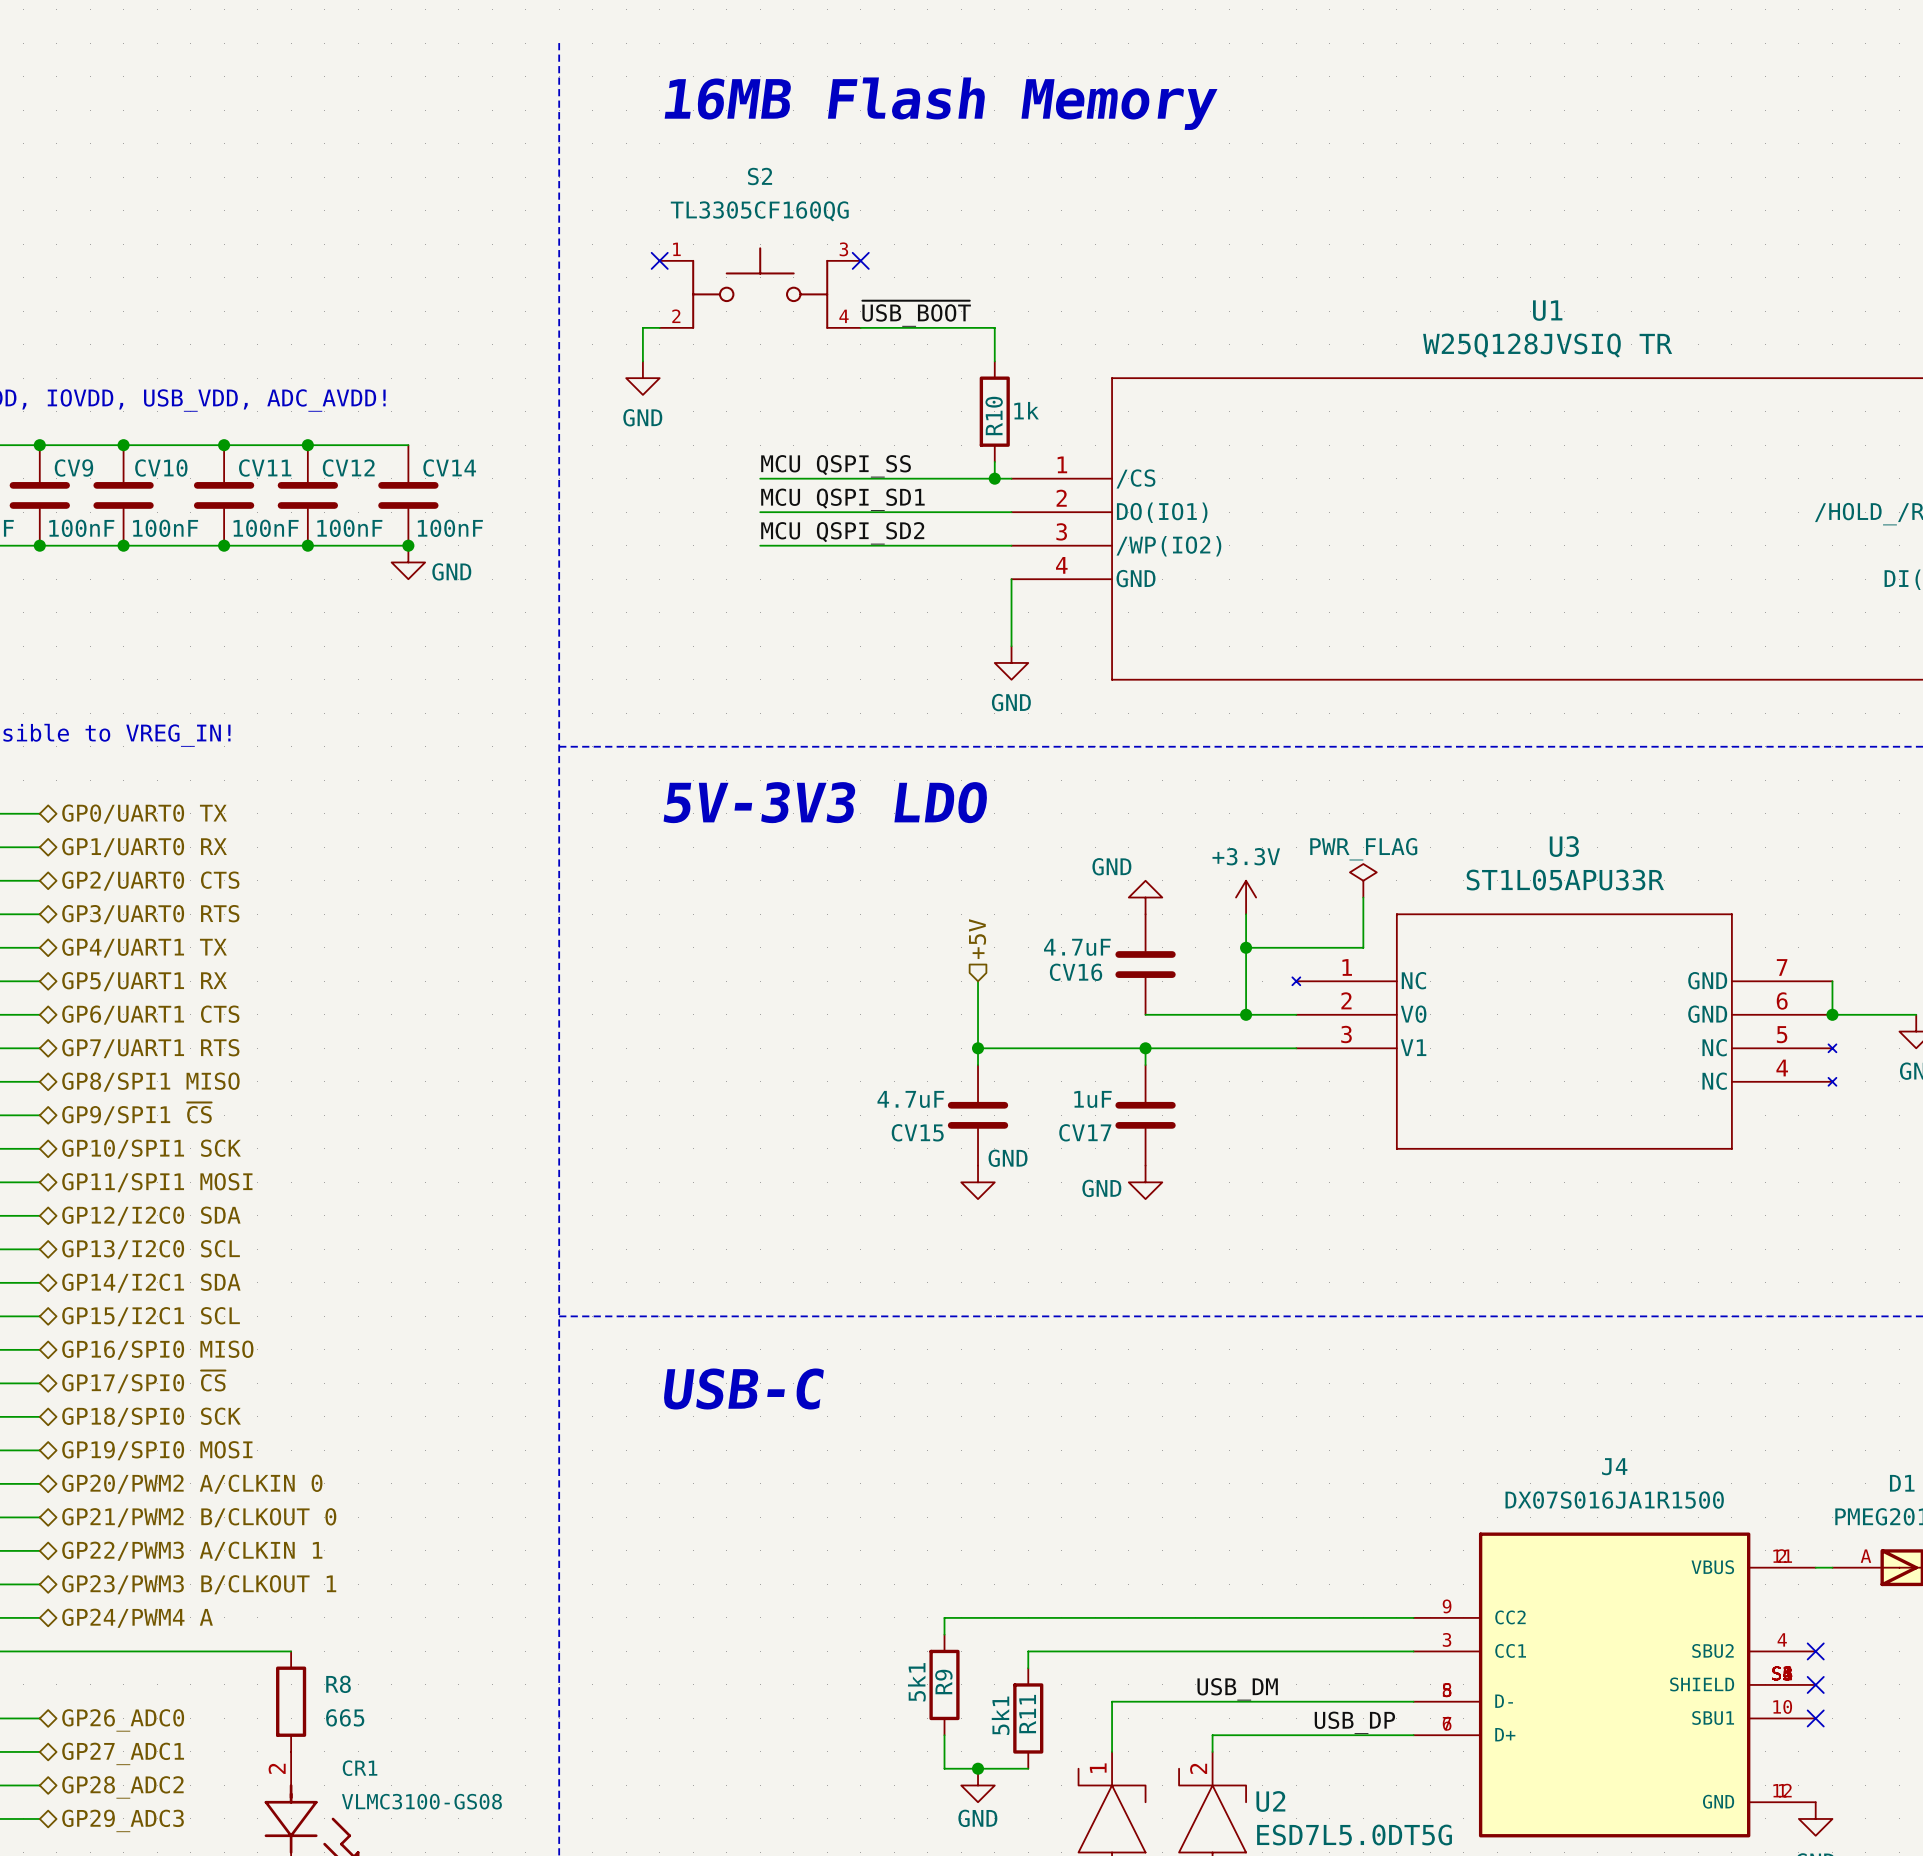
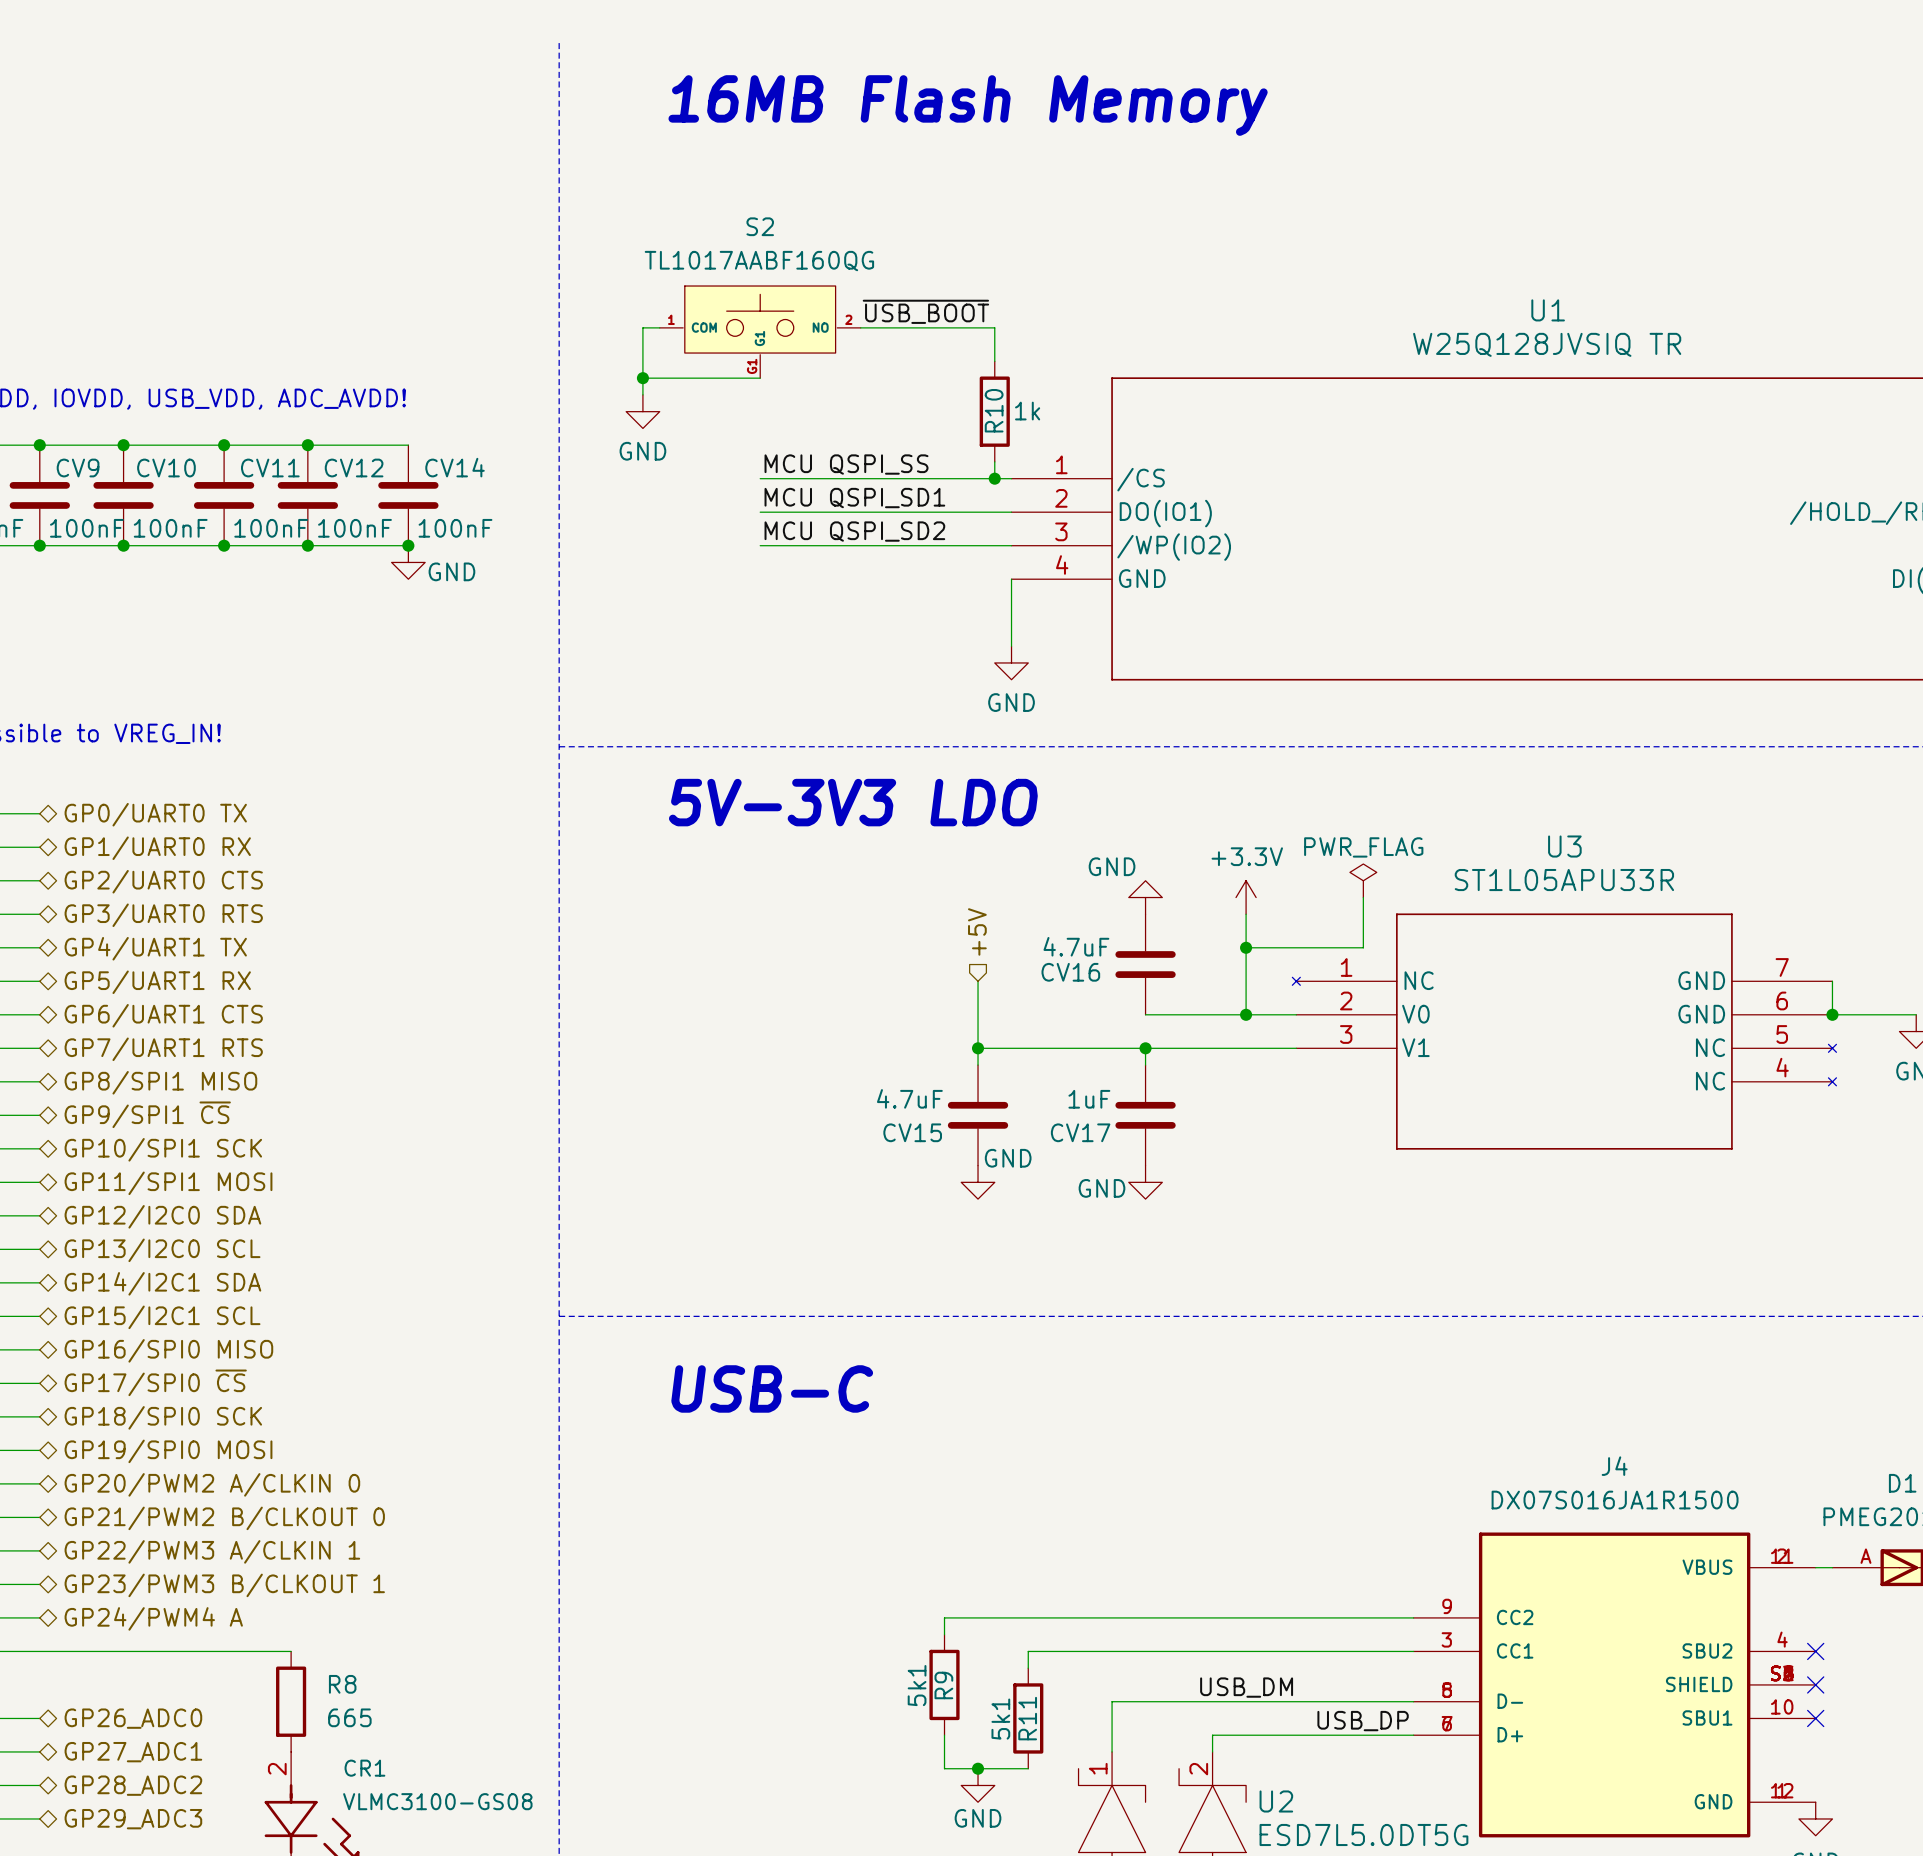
S2 value: TL3305CF160QG (759, 211) -> TL1017AABF160QG (759, 261)
S2 symbol: [659, 247, 861, 329] -> [659, 286, 861, 379]
no-connect mark: (659, 260) -> none
no-connect mark: (860, 260) -> none
wire: none -> (642, 378) (760, 378)
power symbol position: GND (642, 378) -> GND (642, 411)
junction: none -> (642, 378)

